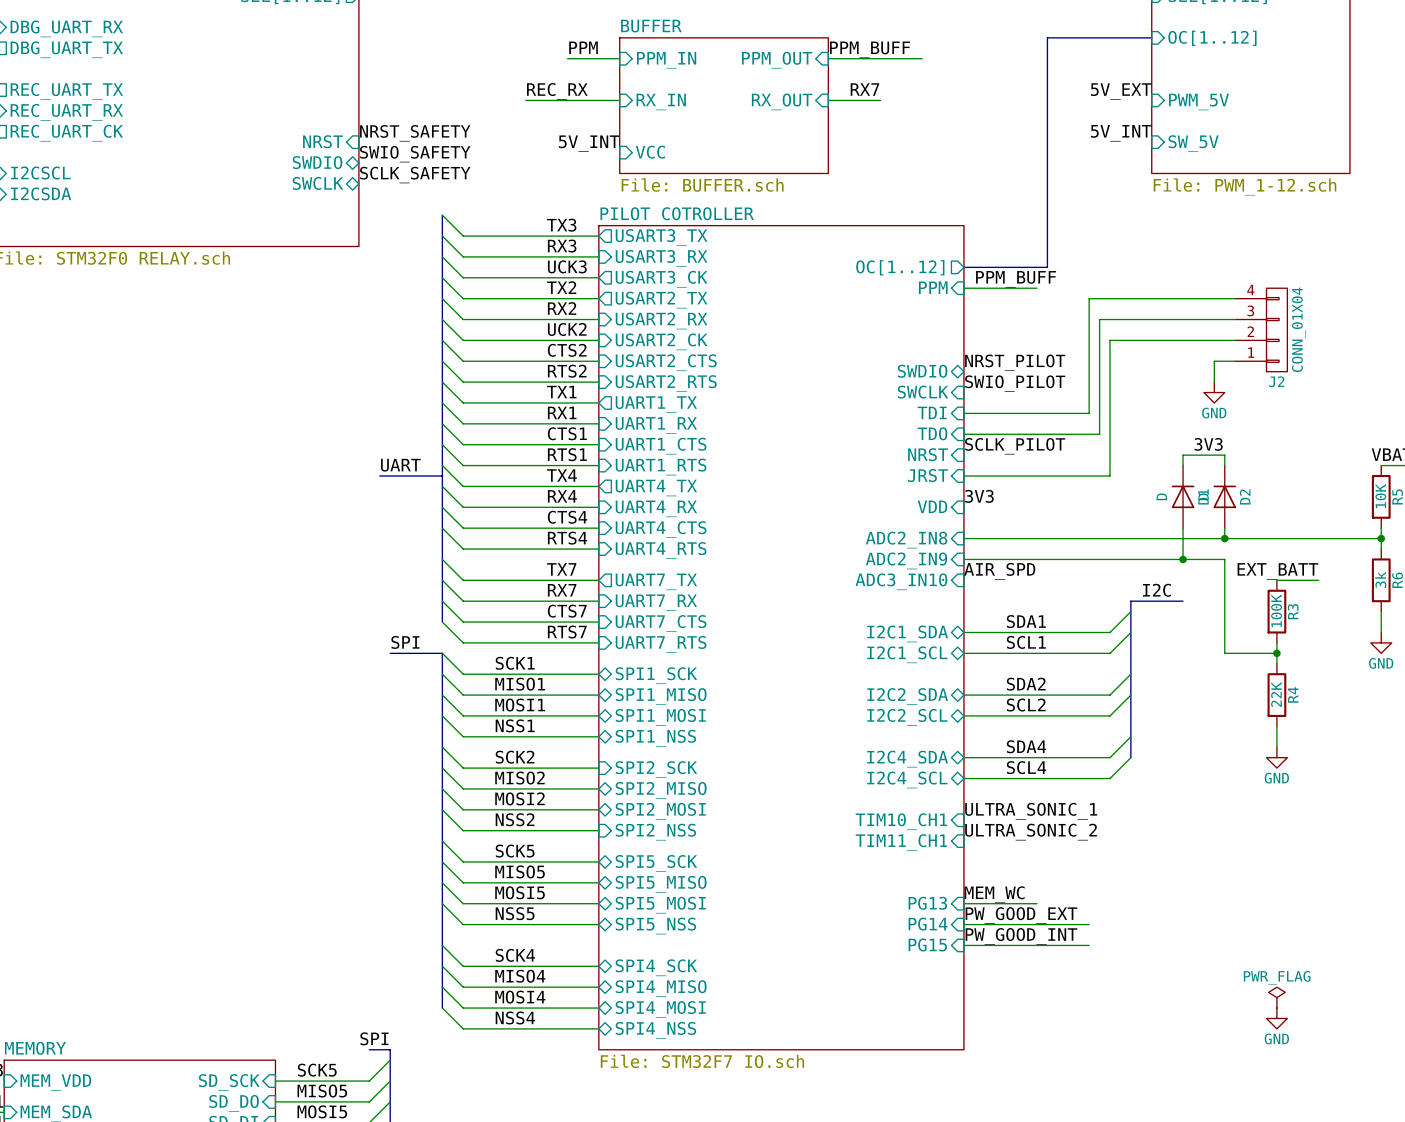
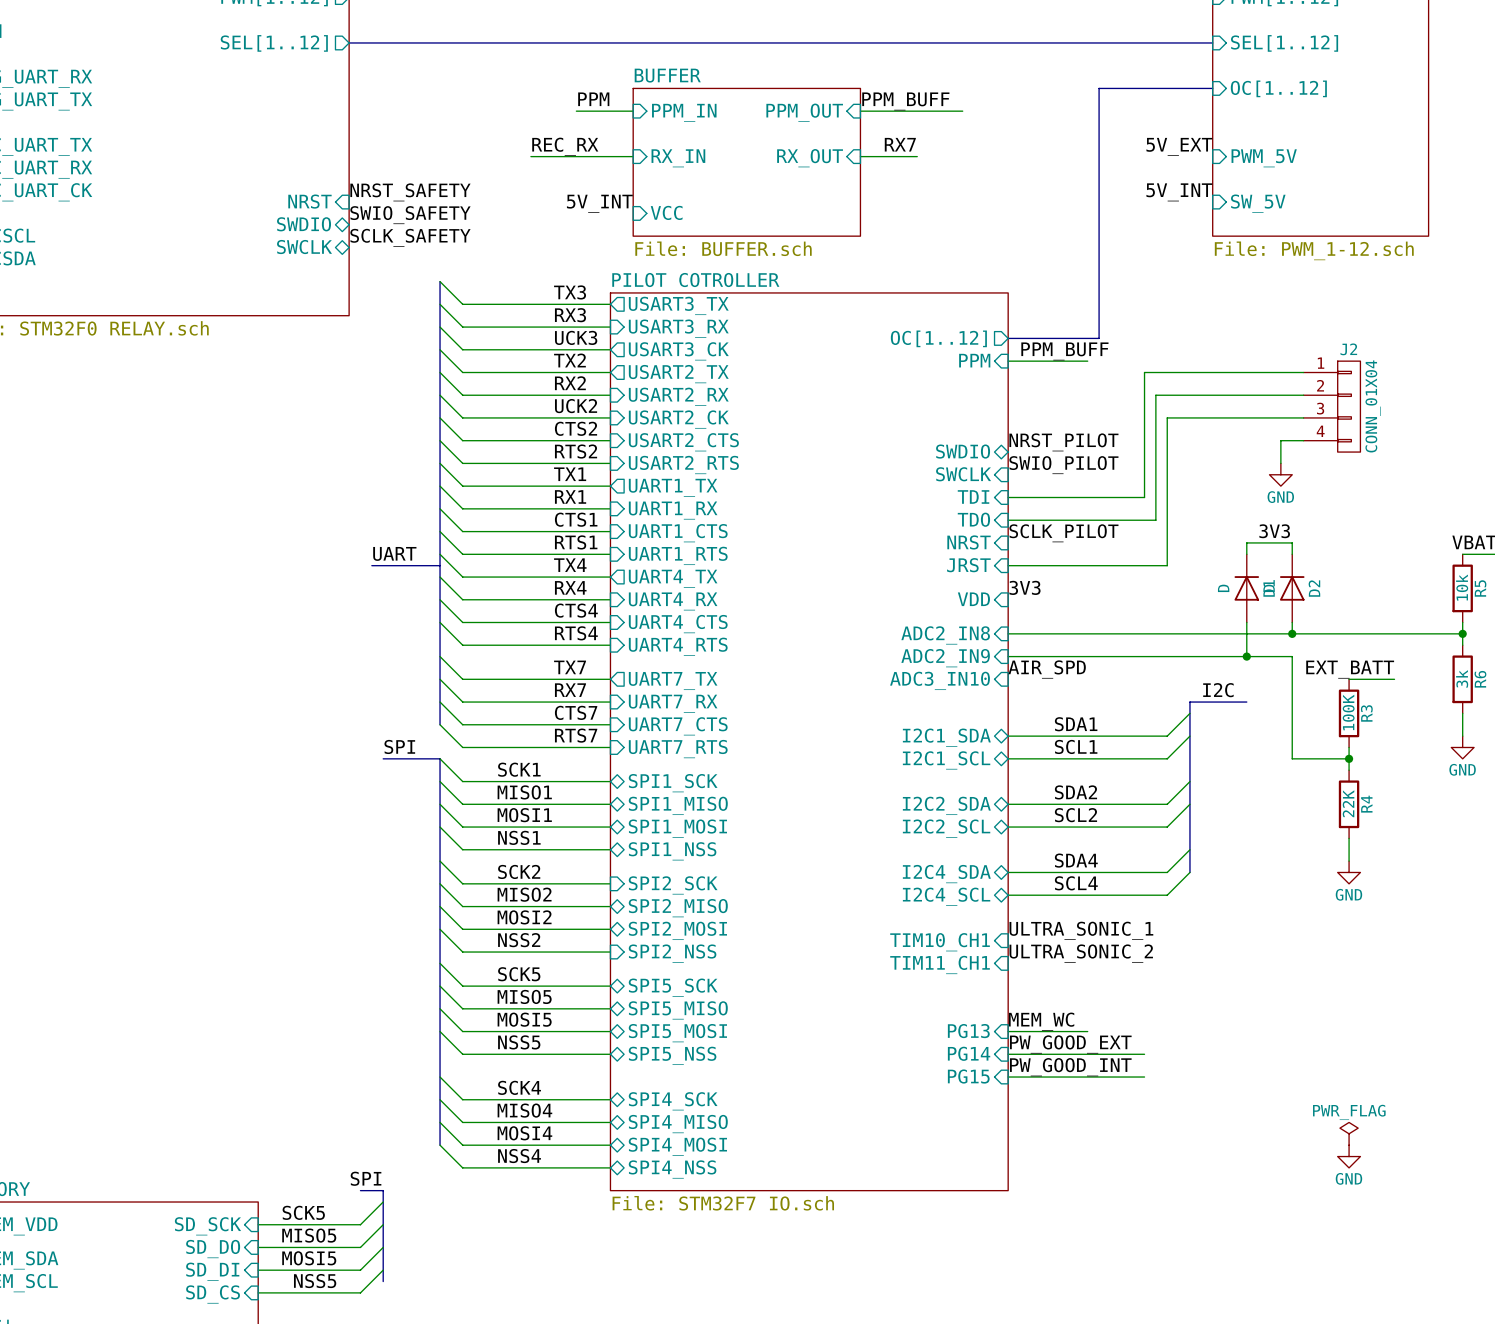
J2 flip: as is (1276, 329) -> up-down (1349, 406)
R5 value: 10K (1380, 496) -> 10k (1462, 587)

